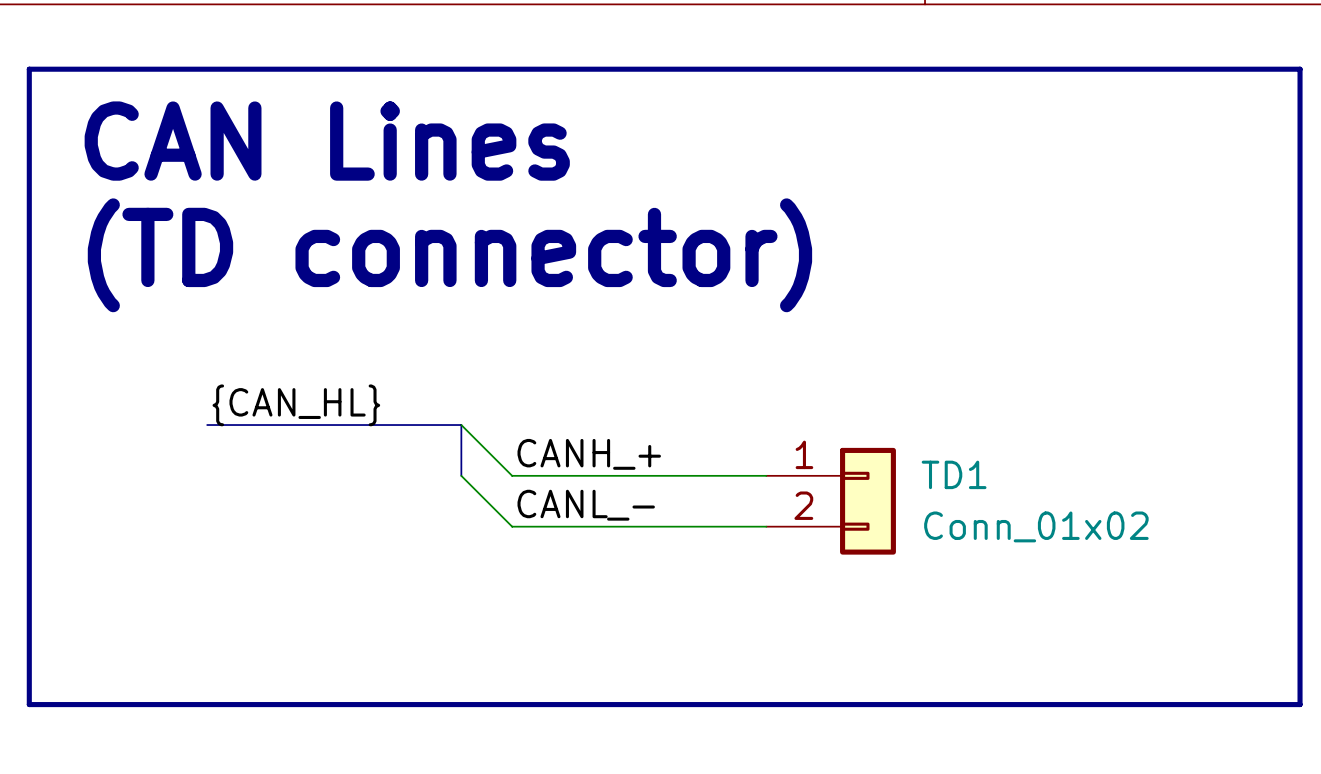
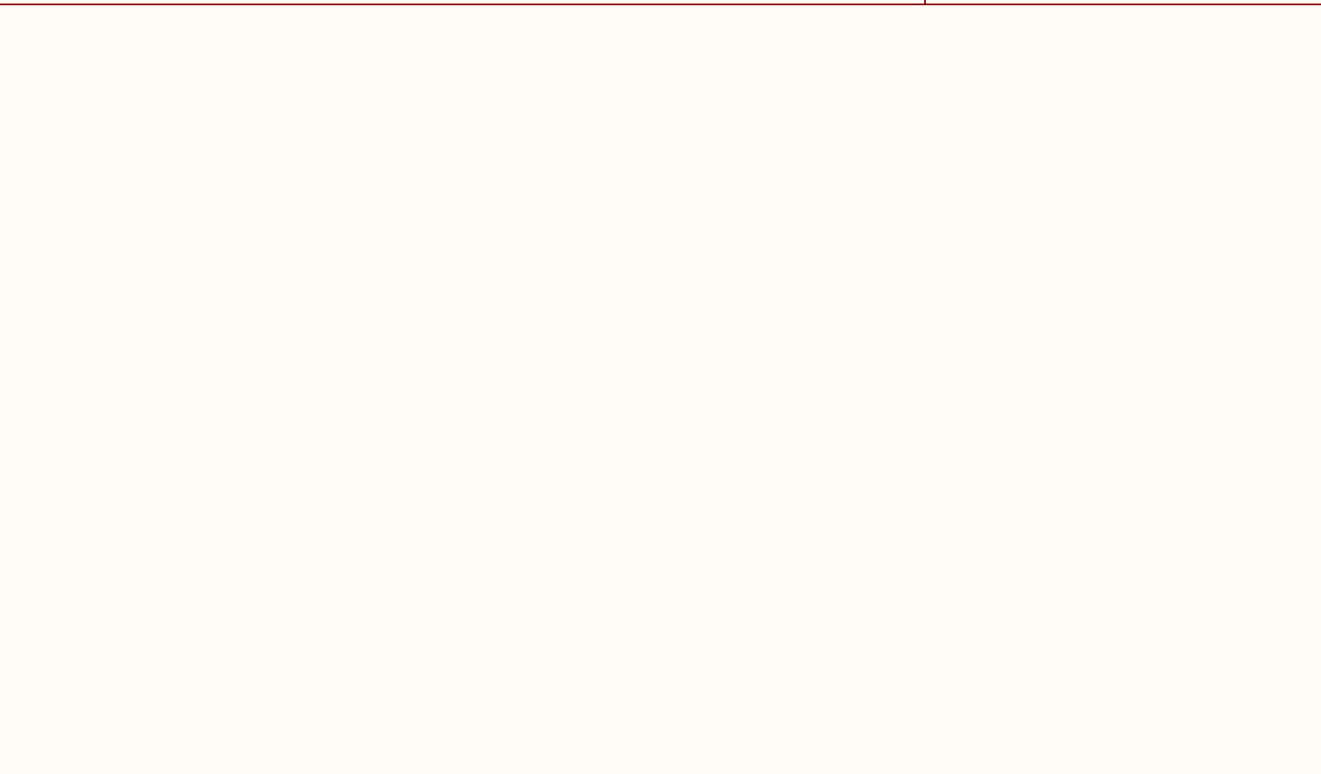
line: (29, 69) (1300, 69) (1300, 704) (29, 704) (29, 69) -> none
text: CAN Lines (327, 141) -> none
text: (TD connector) (449, 255) -> none
label: {CAN_HL} (296, 405) -> none
bus: (207, 425) (461, 425) (461, 475) -> none
wire: (461, 425) (512, 475) (766, 475) -> none
label: CANH_+ (589, 454) -> none
wire: (461, 475) (512, 526) (766, 526) -> none
TD1: Conn_01x02 (831, 501) -> none
label: CANL_- (586, 505) -> none

